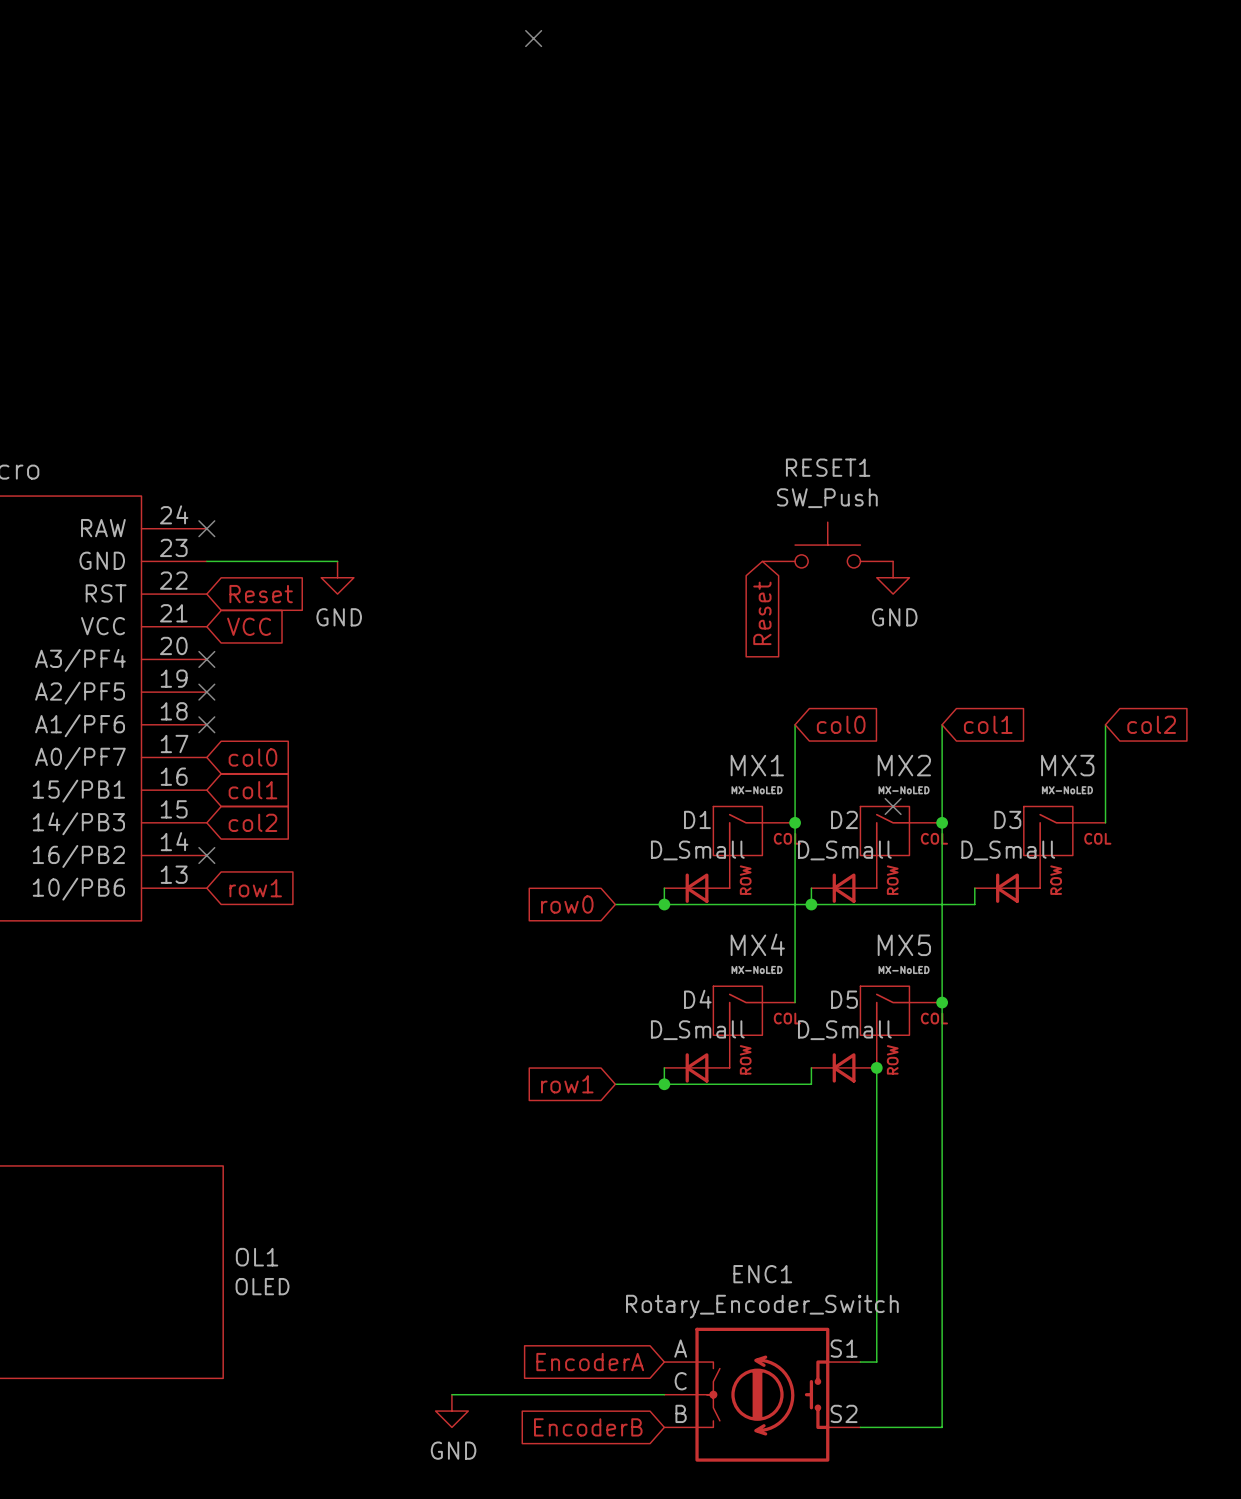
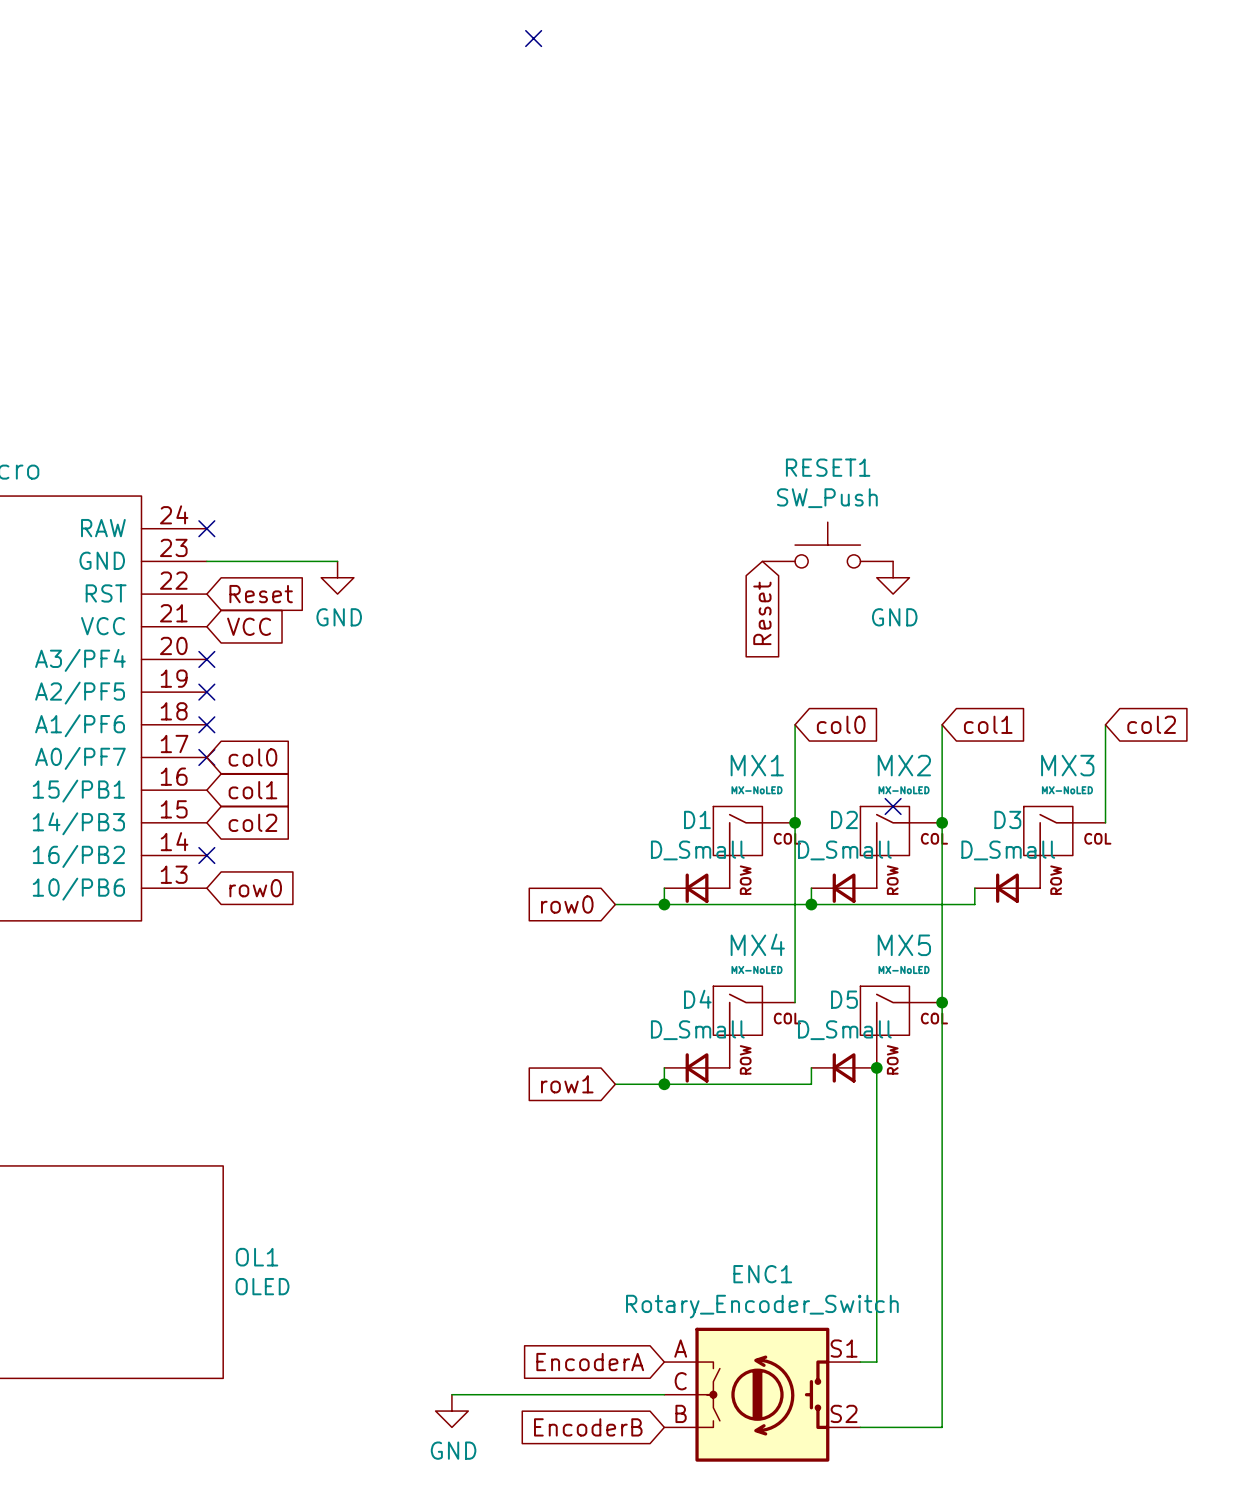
no-connect mark: none -> (206, 757)
global label: row1 (255, 888) -> row0 (255, 888)

